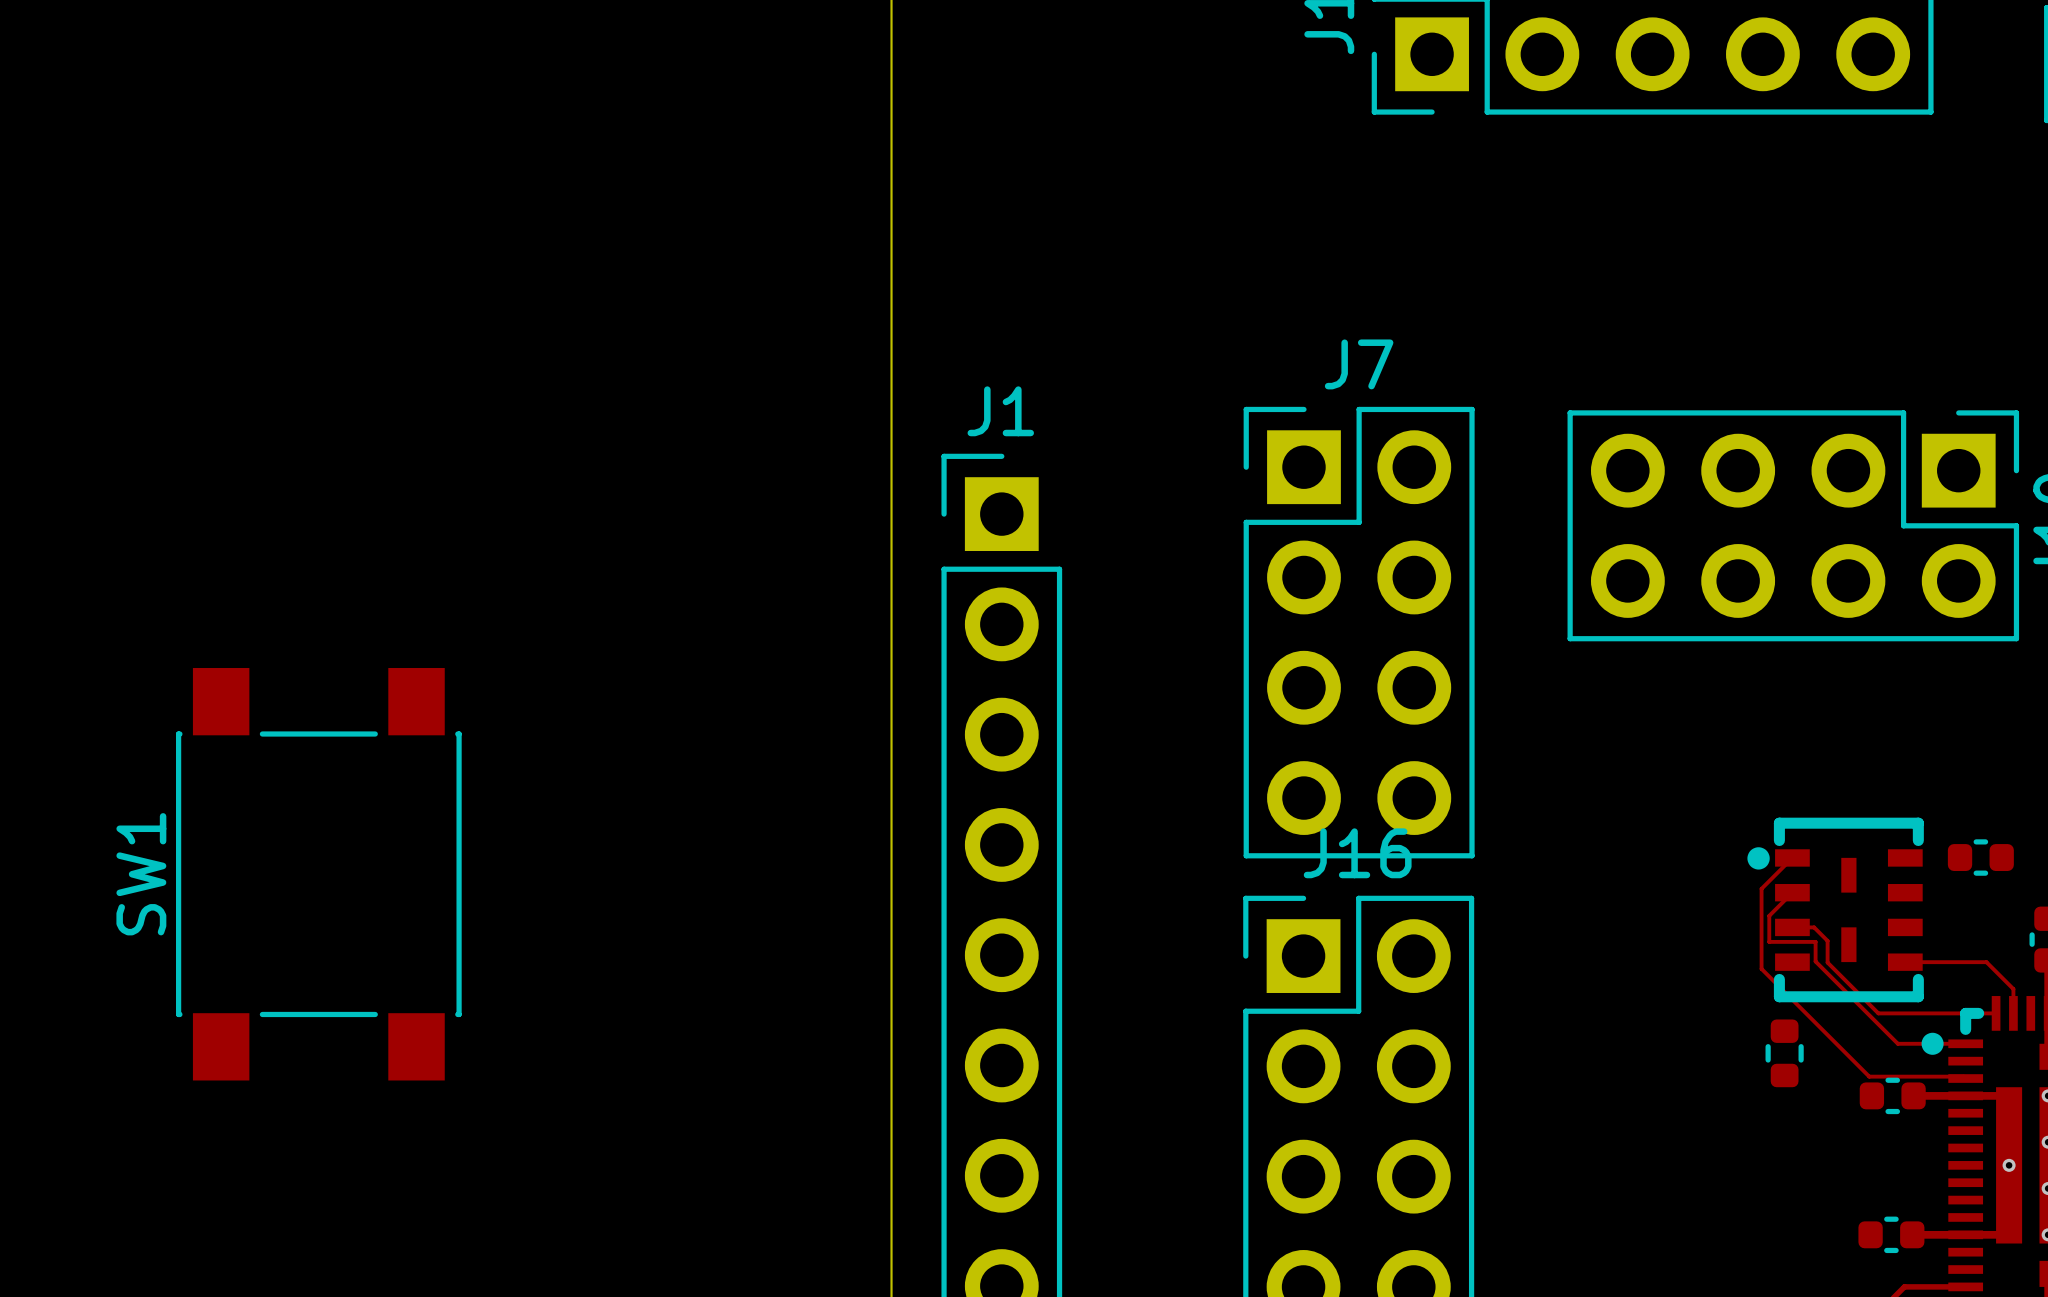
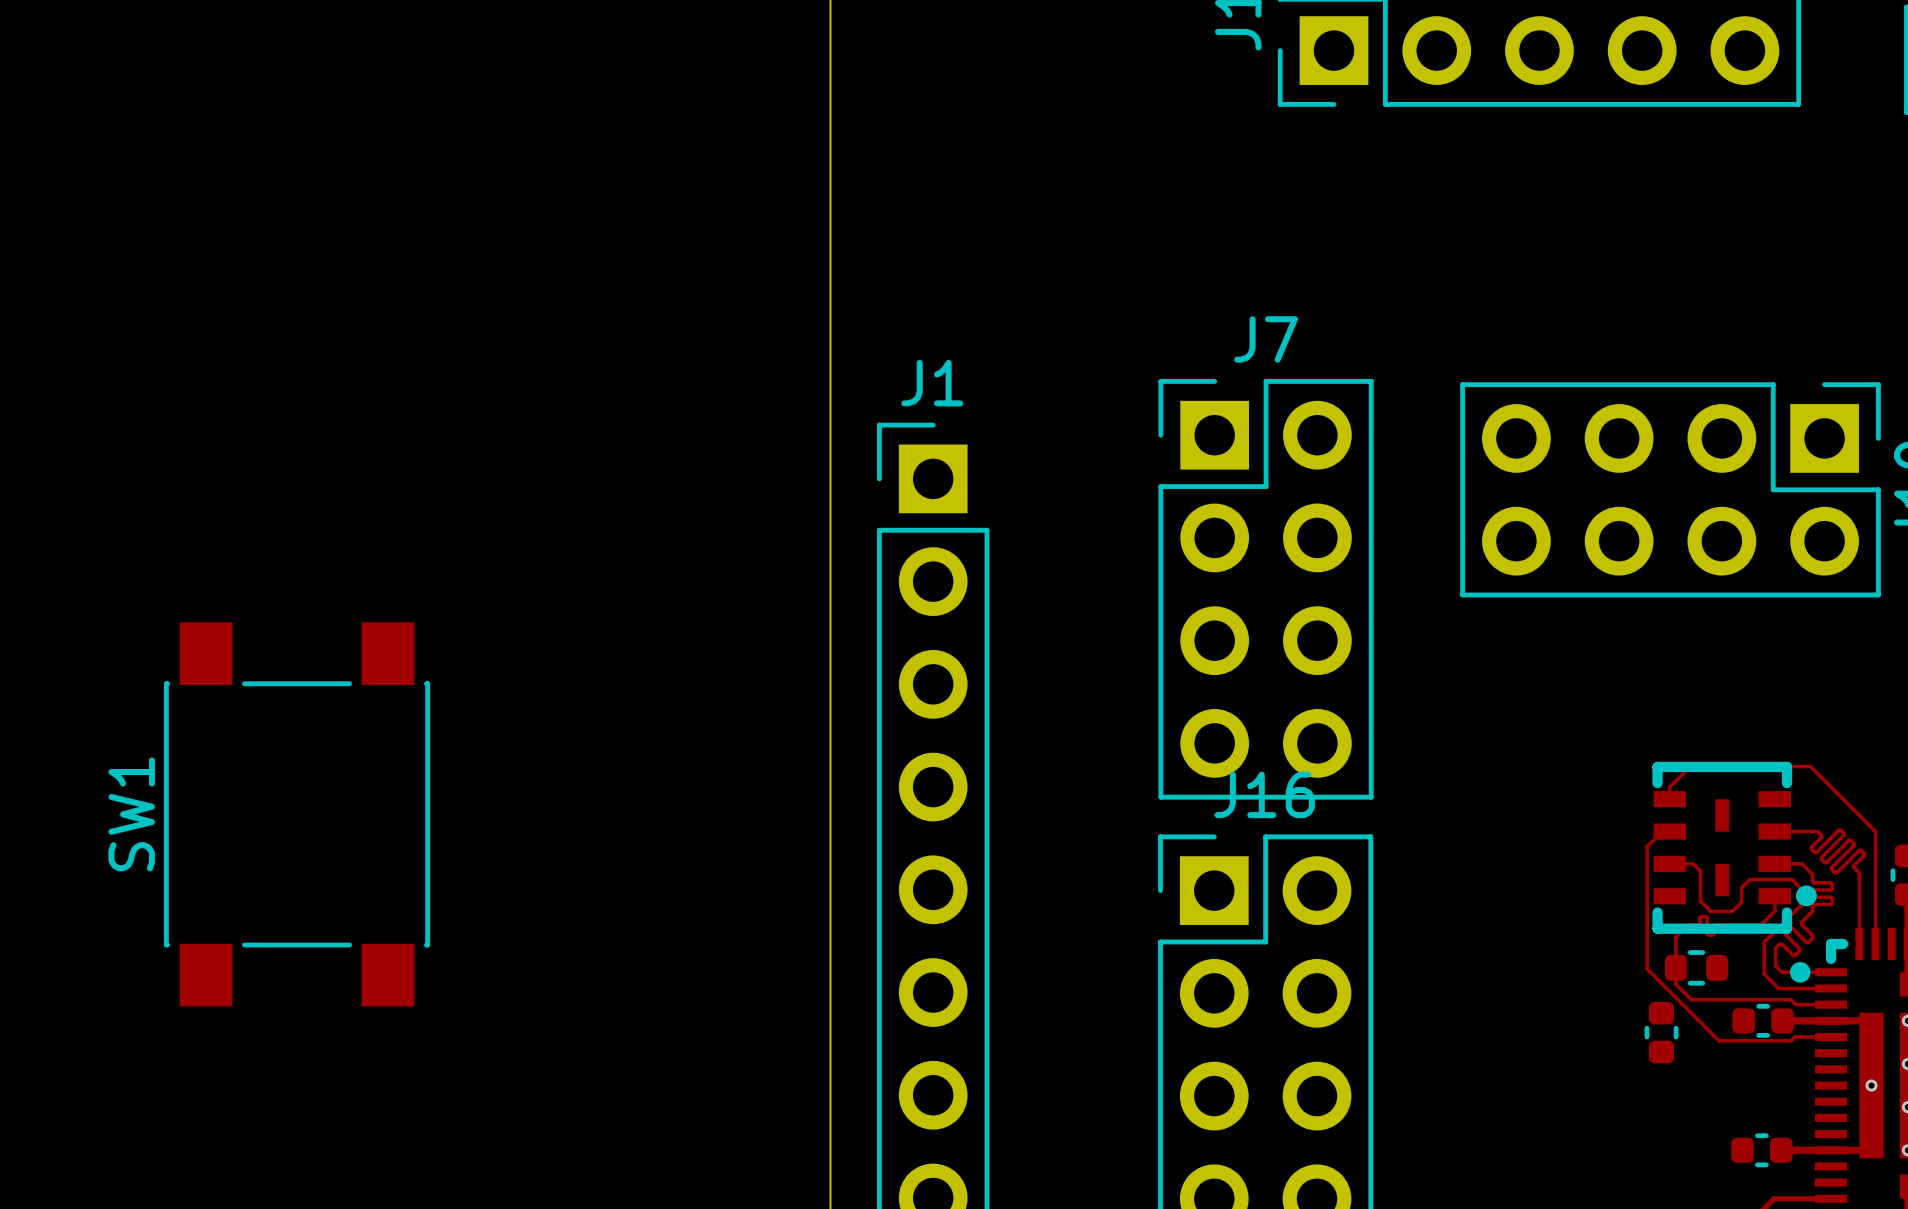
track: (1792, 857) (1761, 888) (1761, 968) (1869, 1076) (1963, 1076) (1965, 1078) -> (1669, 799) (1669, 787) (1690, 766) (1810, 766) (1875, 831) (1875, 921)
part: (1980, 857) -> none
track: (1792, 892) (1769, 915) (1769, 941) (1815, 941) (1815, 961) (1897, 1043) (1913, 1043) -> (1669, 831) (1662, 831) (1647, 846) (1647, 968) (1719, 1040) (1790, 1040) (1794, 1037) (1831, 1037)
track: none -> (1774, 831) (1818, 831) (1821, 836) (1811, 847) (1815, 852) (1840, 830) (1843, 835) (1821, 858) (1826, 862) (1848, 840) (1853, 843) (1853, 845) (1831, 867) (1835, 872) (1858, 850) (1864, 853) (1853, 866) (1859, 872) (1859, 944)
part rotation: 0° (1835, 909) -> 180° (1734, 847)
track: (1814, 927) (1827, 940) (1827, 962) (1878, 1013) (1996, 1013) -> (1689, 863) (1693, 863) (1700, 871) (1700, 901) (1710, 911) (1732, 911) (1741, 902) (1741, 887) (1749, 879) (1792, 879) (1801, 888) (1801, 905) (1764, 942) (1764, 974) (1778, 988) (1831, 988)
track: none -> (1774, 863) (1802, 863) (1812, 874) (1813, 882) (1832, 884) (1831, 889) (1809, 891) (1810, 897) (1832, 898) (1831, 904) (1813, 904) (1812, 911) (1801, 922) (1812, 935) (1812, 938) (1806, 942) (1790, 927) (1785, 933) (1799, 948) (1799, 951) (1794, 955) (1781, 944) (1775, 948) (1775, 965) (1782, 972)
track: (1905, 962) (1986, 962) (2013, 989) -> (1774, 896) (1774, 911) (1761, 924) (1715, 924) (1712, 934) (1707, 933) (1705, 916) (1700, 917) (1698, 924) (1688, 924) (1675, 937) (1675, 984) (1691, 999) (1790, 999) (1795, 1004) (1831, 1004)
part rotation: 0° (1784, 1053) -> 90° clockwise (1696, 967)
part: none -> (1661, 1032)

